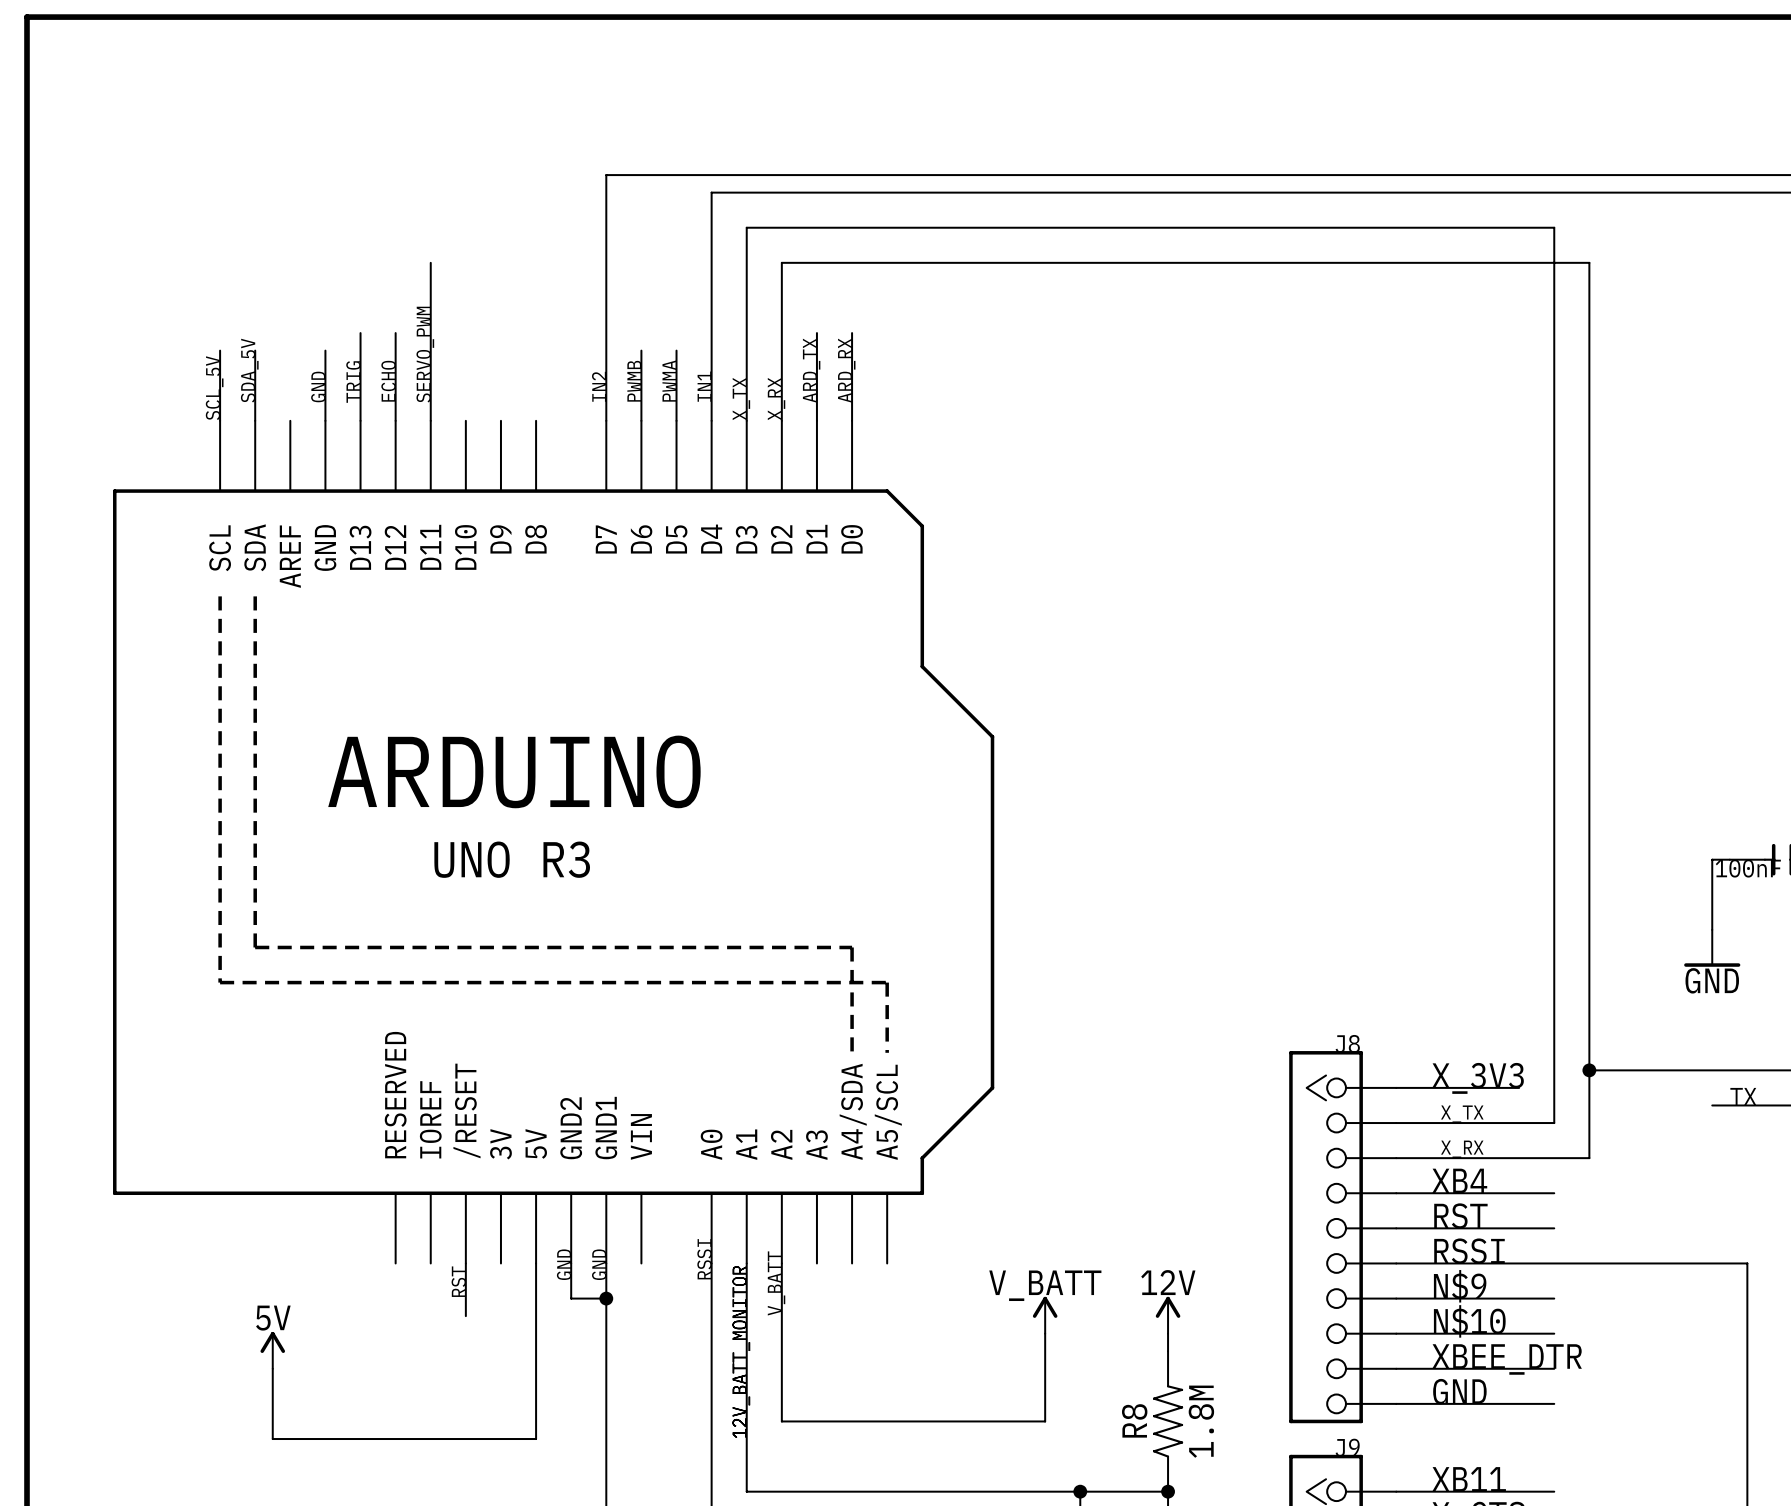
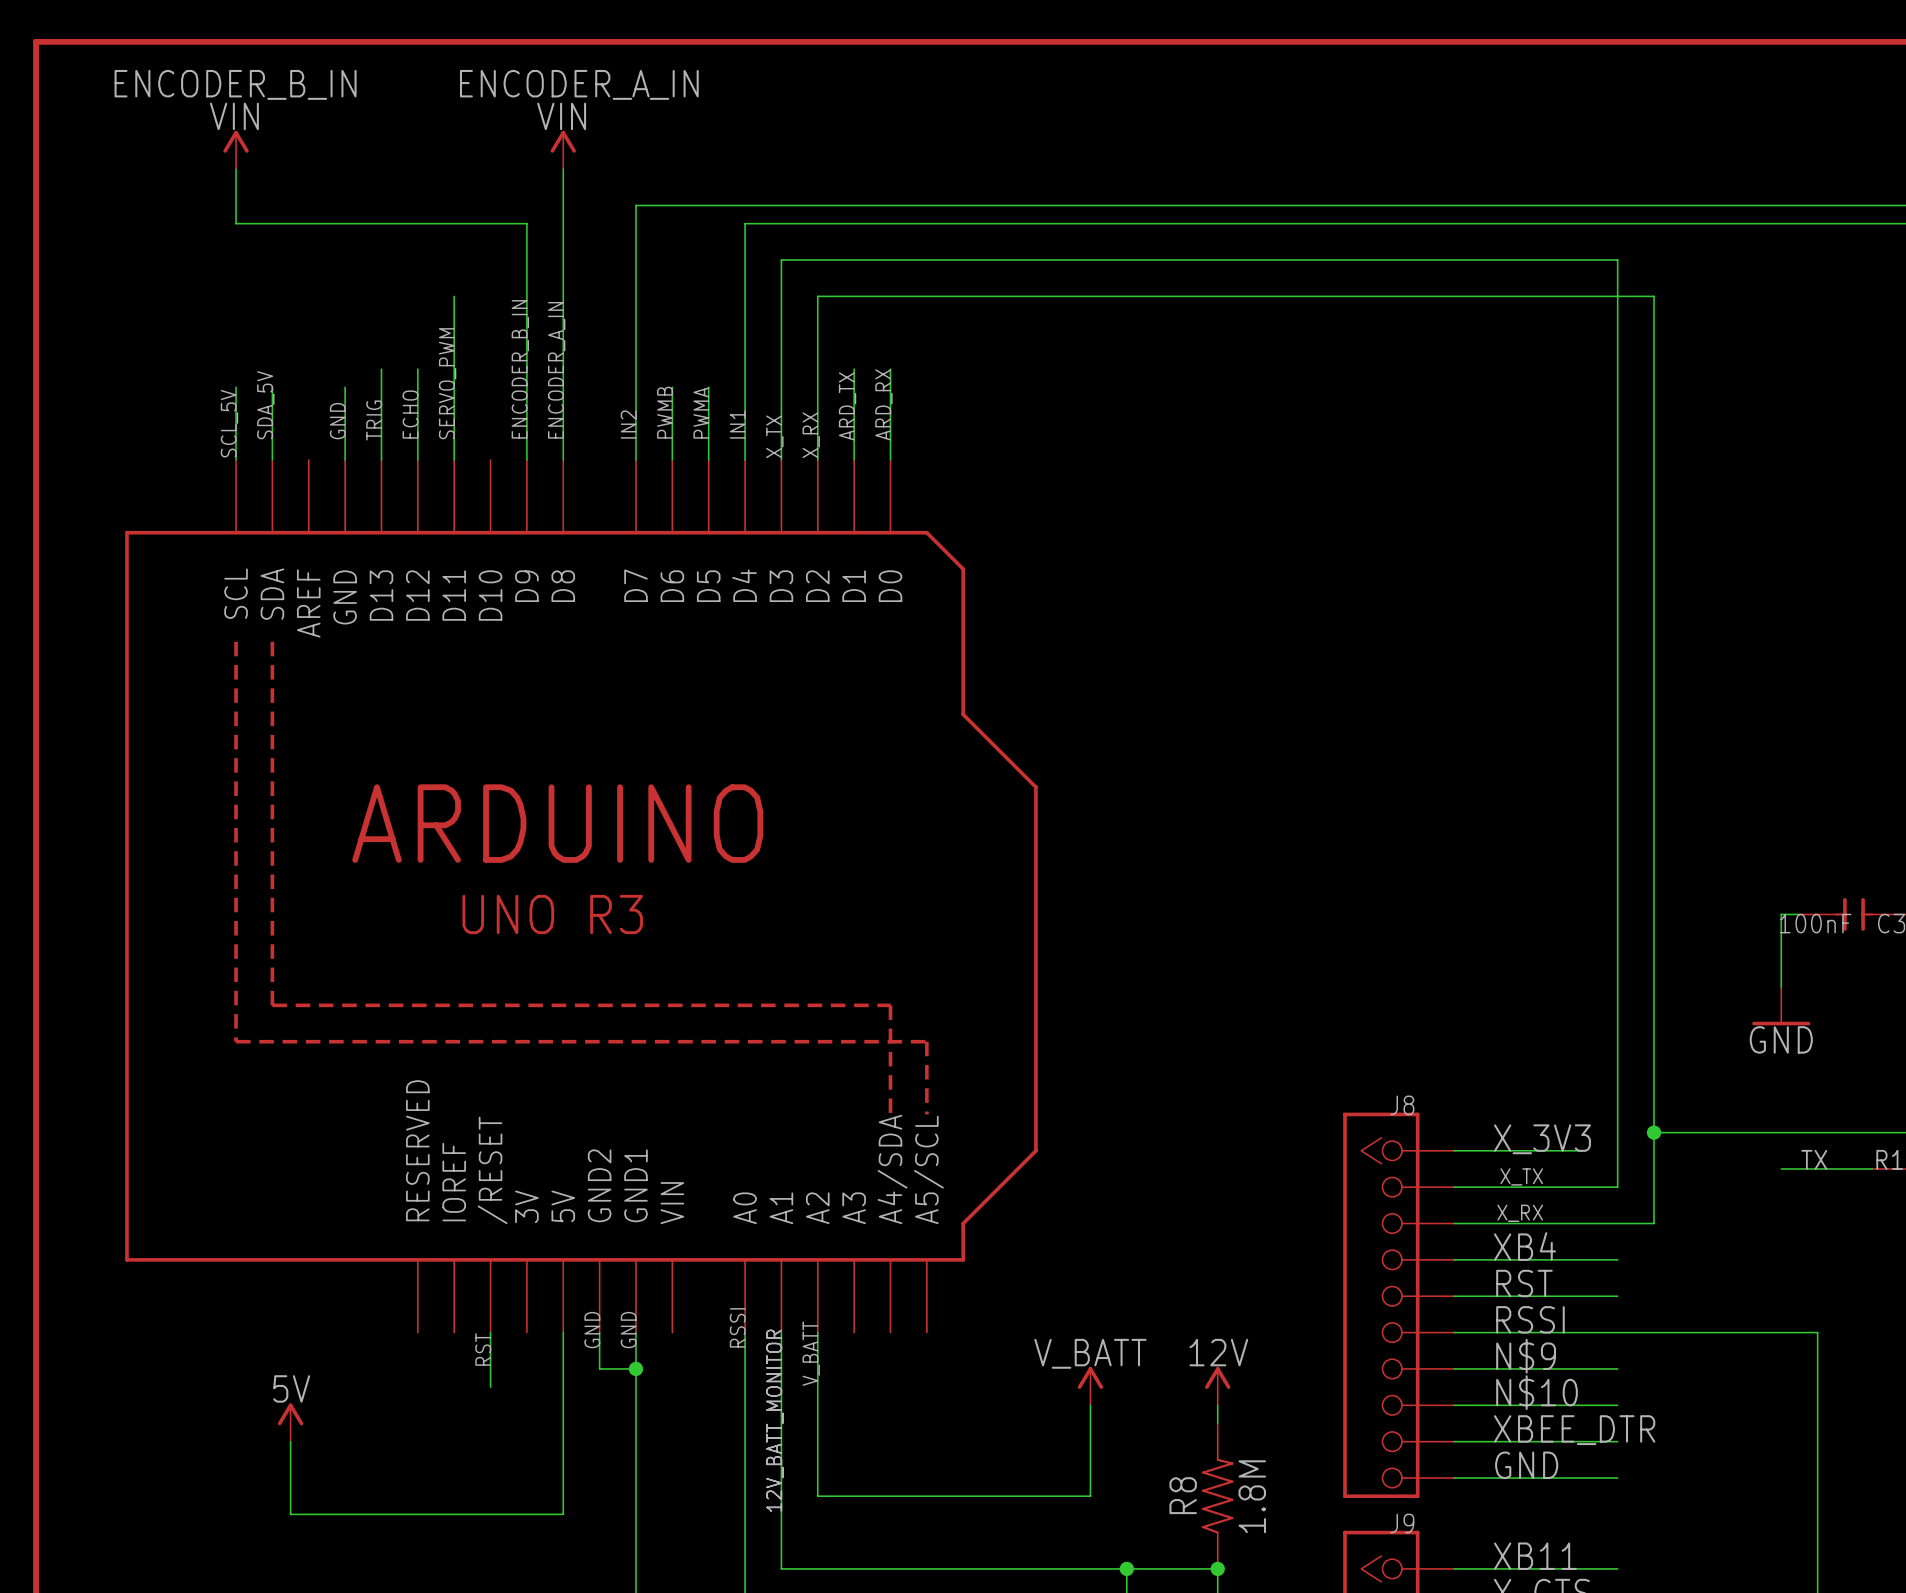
power symbol: none -> VIN (236, 150)
power symbol: none -> VIN (563, 150)
wire: none -> (236, 169) (236, 223) (526, 223) (526, 459)
wire: none -> (563, 169) (563, 459)
label: none -> ENCODER_B_IN (520, 369)
label: none -> ENCODER_A_IN (556, 370)

